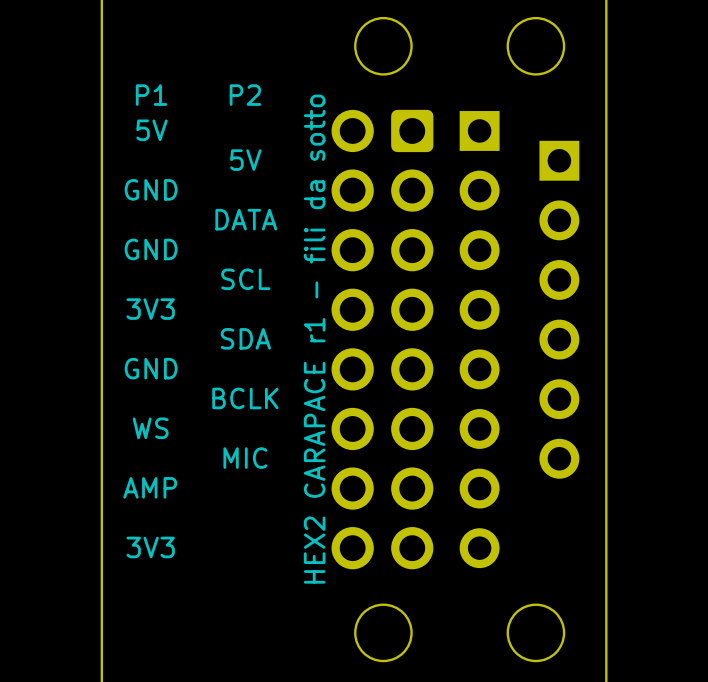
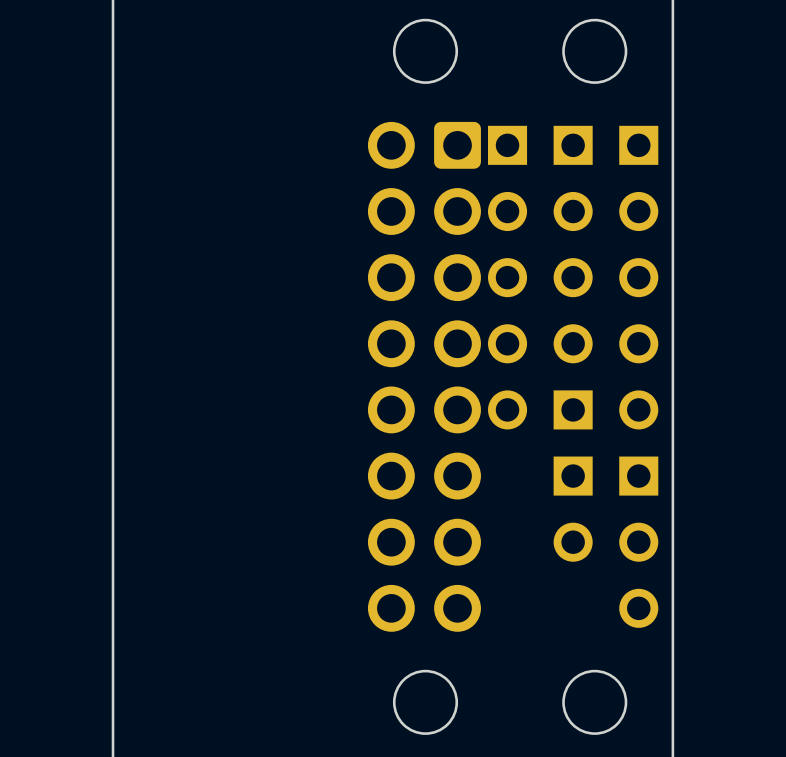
text: P1 (151, 95) -> none
text: P2 (245, 95) -> none
text: 5V (152, 130) -> none
text: 5V (245, 160) -> none
text: GND (151, 189) -> none
text: DATA (246, 219) -> none
part: none -> (573, 244)
text: GND (151, 249) -> none
part: none -> (507, 277)
part: none -> (638, 277)
text: SCL (245, 279) -> none
text: 3V3 (150, 309) -> none
part: (559, 309) -> none
text: SDA (245, 338) -> none
text: HEX2 CARAPACE r1 - fili da sotto (314, 339) -> none
part: (479, 339) -> none
text: GND (151, 368) -> none
part: none -> (573, 409)
text: BCLK (245, 398) -> none
text: WS (150, 428) -> none
text: MIC (245, 458) -> none
part: none -> (573, 509)
text: AMP (150, 487) -> none
part: none -> (638, 542)
text: 3V3 (150, 547) -> none

